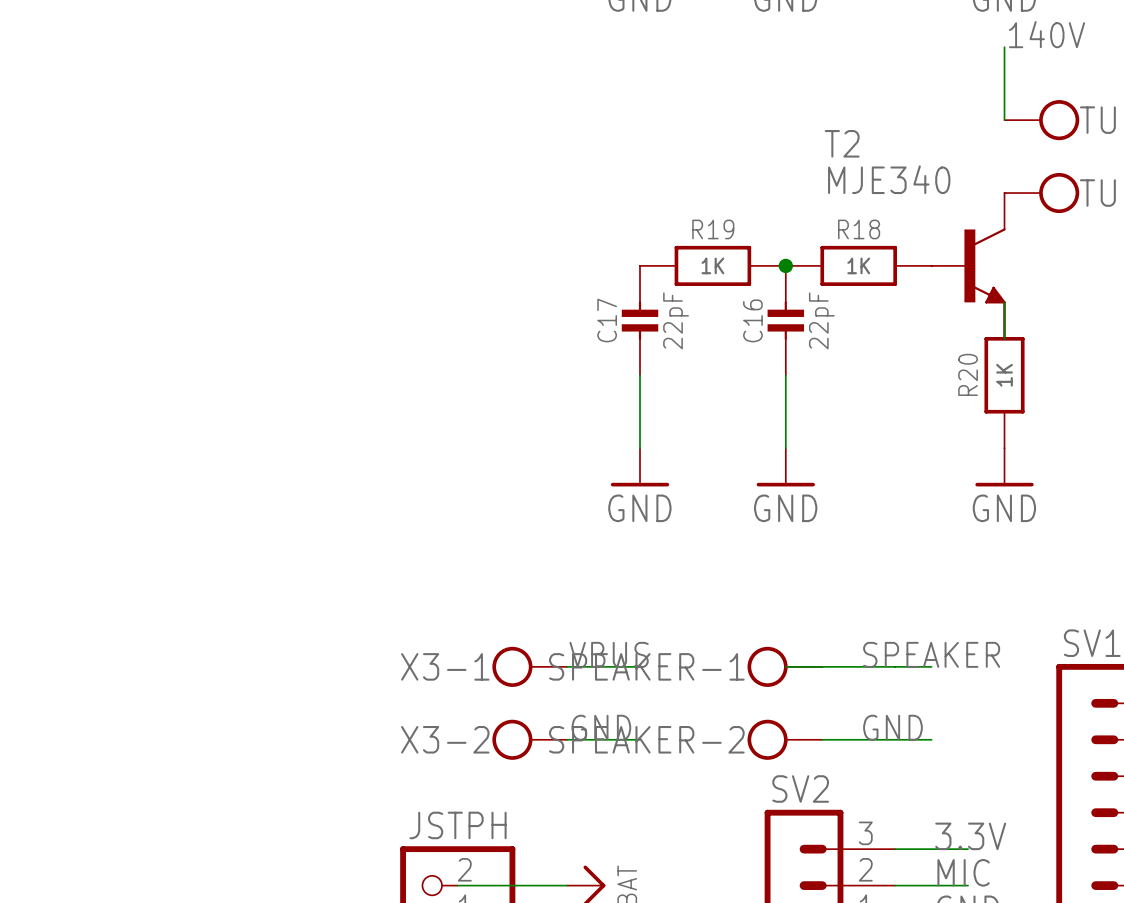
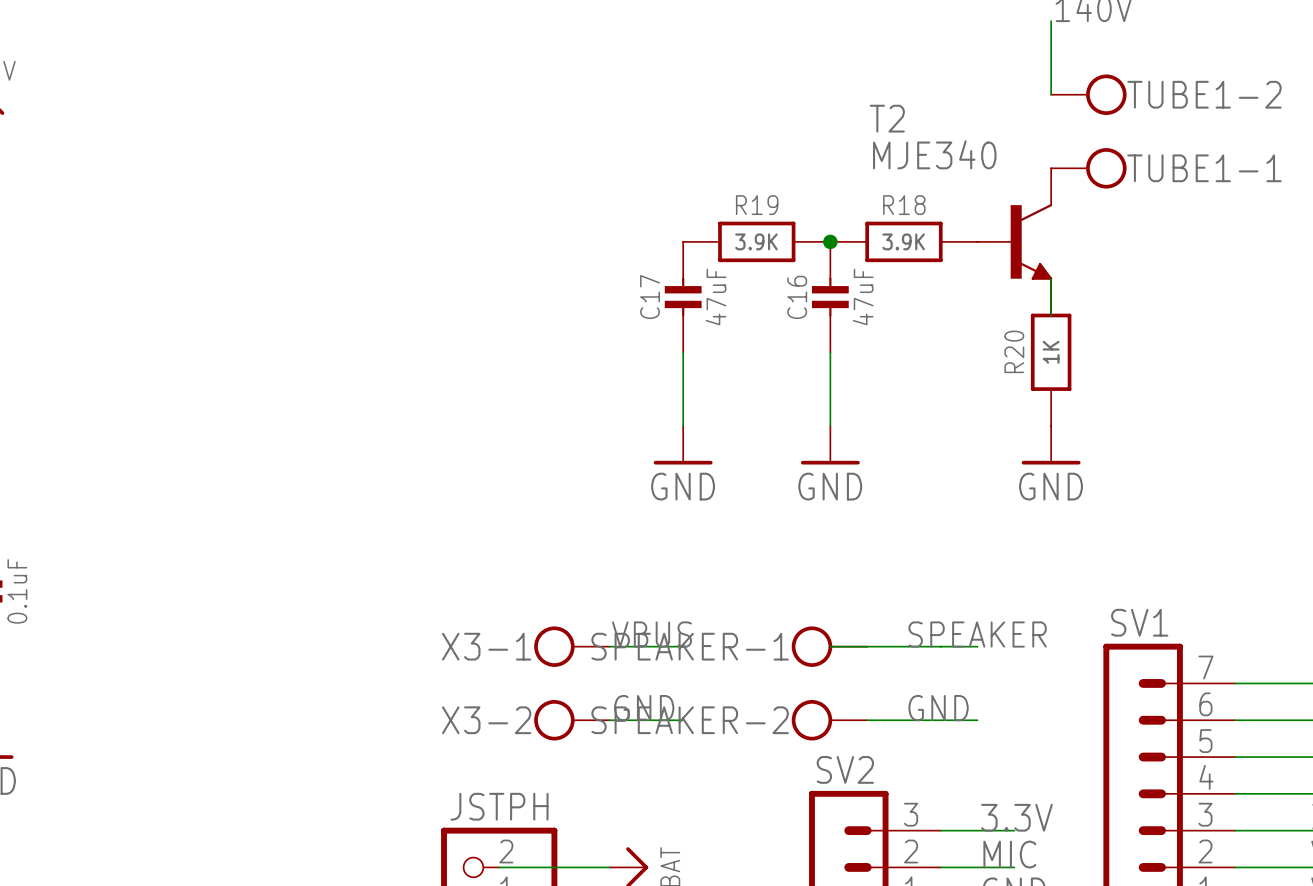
R19 value: 1K (712, 265) -> 3.9K (756, 241)
R18 value: 1K (858, 265) -> 3.9K (903, 241)
C17 value: 22pF (676, 320) -> 47uF (716, 296)
C16 value: 22pF (821, 320) -> 47uF (863, 296)

